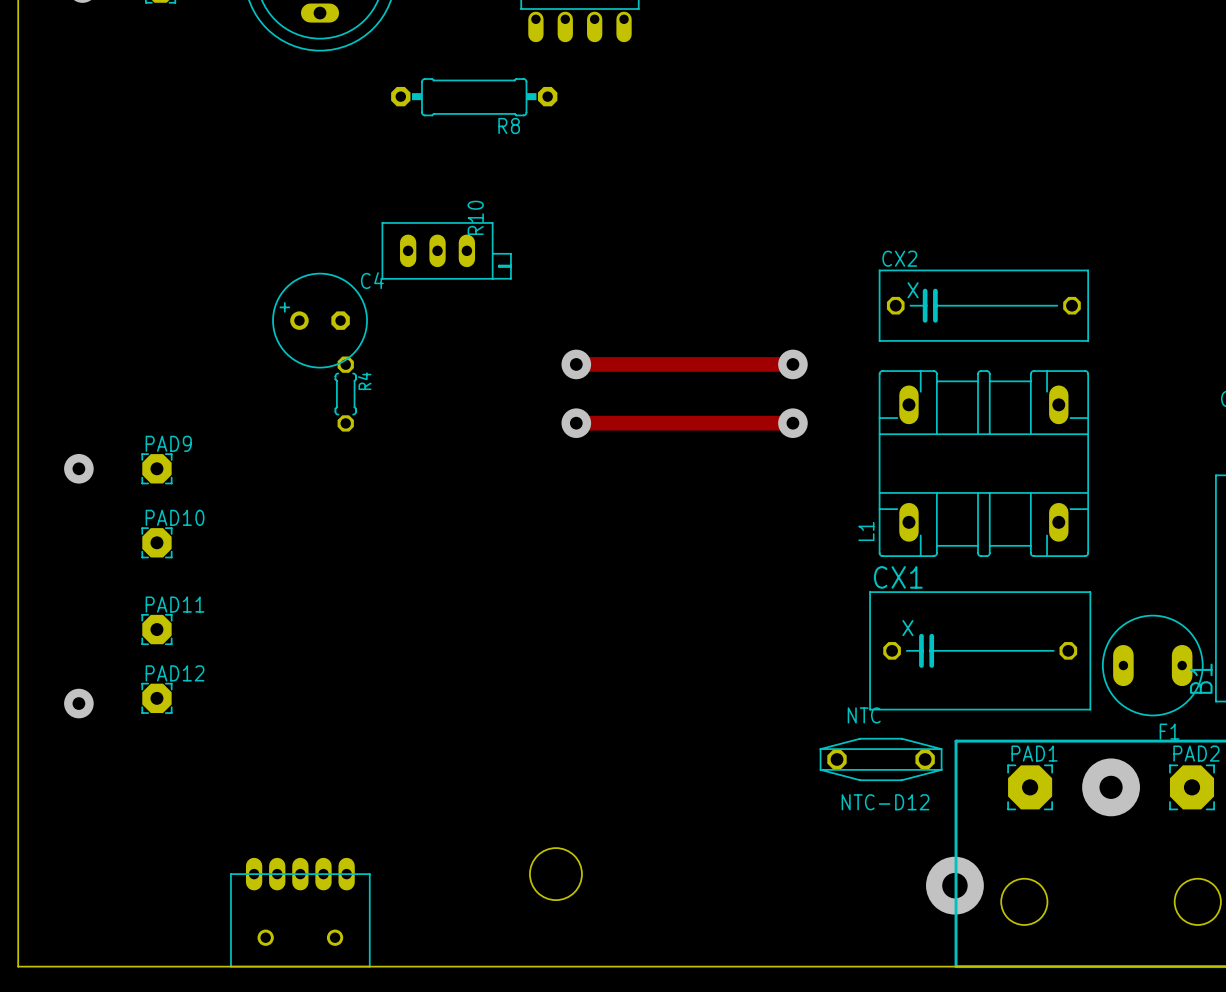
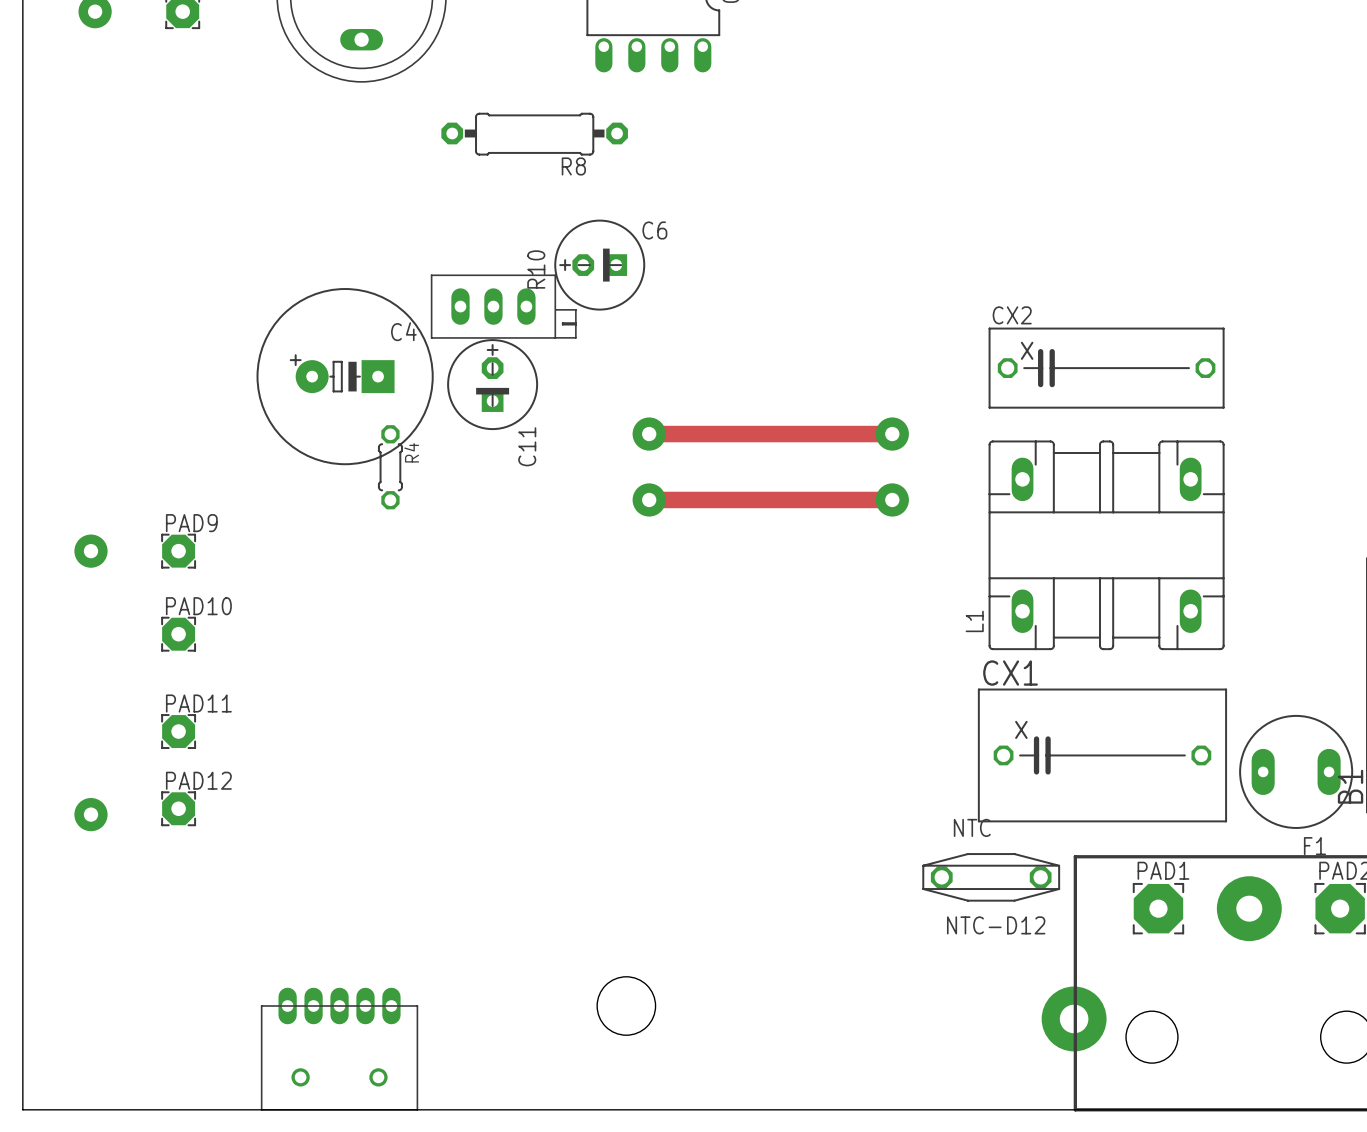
C6: none -> (599, 265)
C4 footprint: [272, 272, 368, 369] -> [256, 288, 434, 466]
C11: none -> (492, 384)

